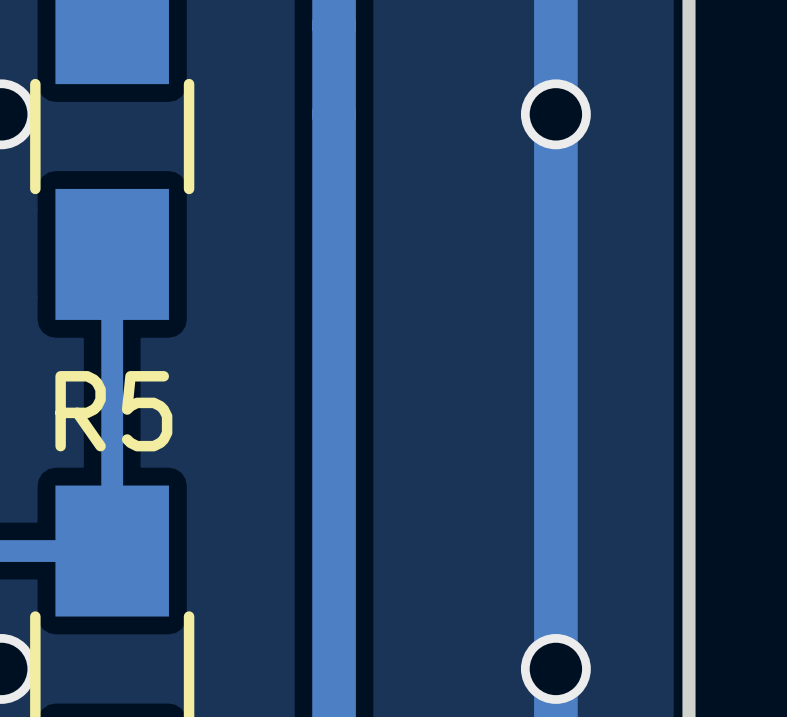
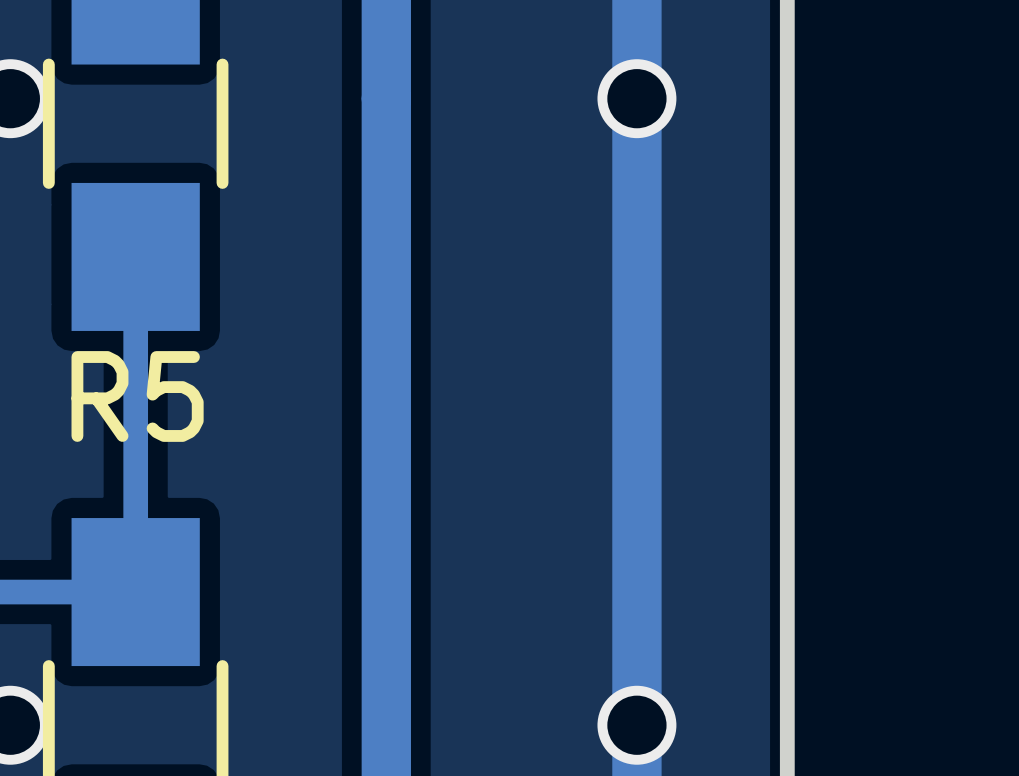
R5 name position: R5 (113, 411) -> R5 (137, 396)

